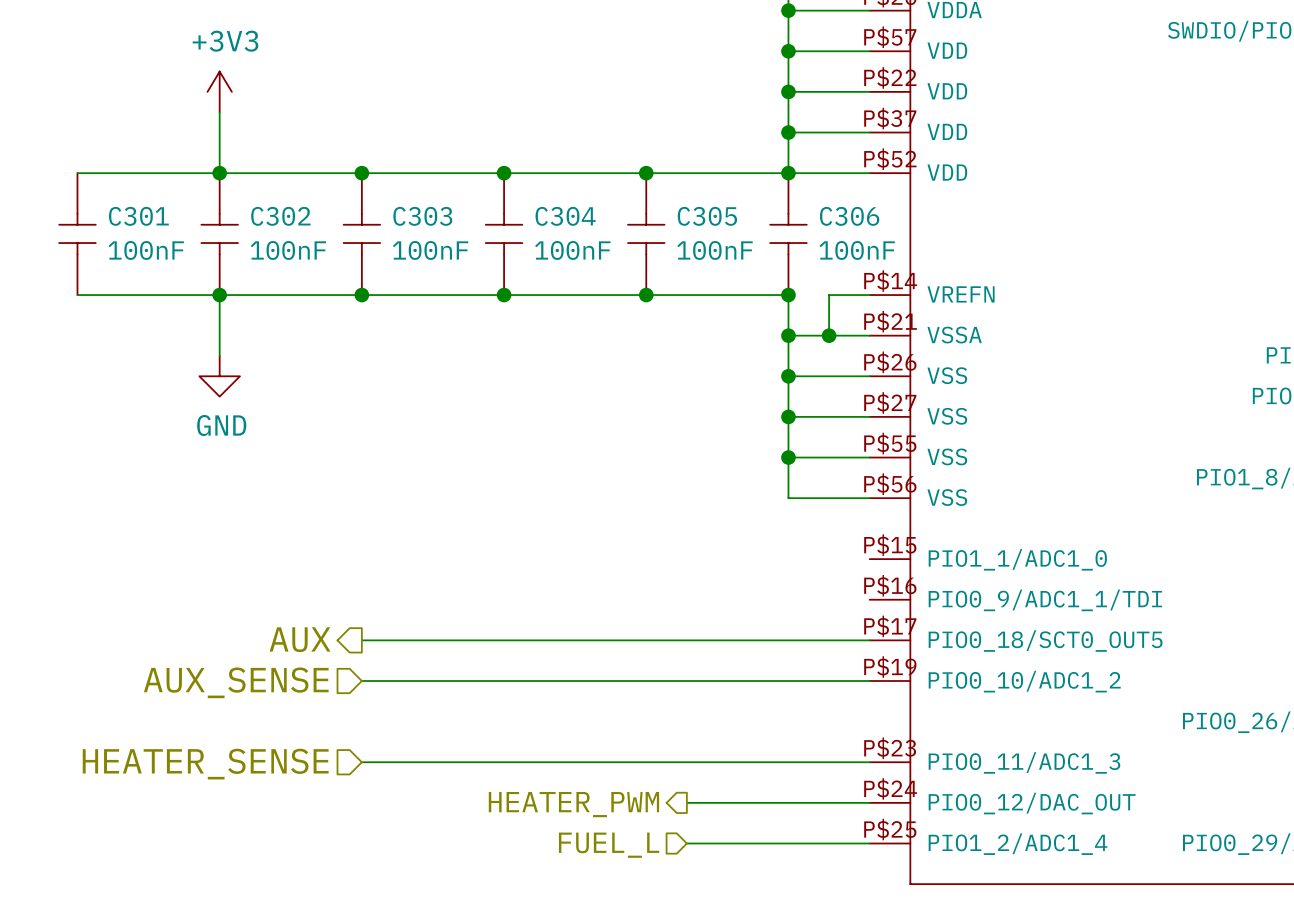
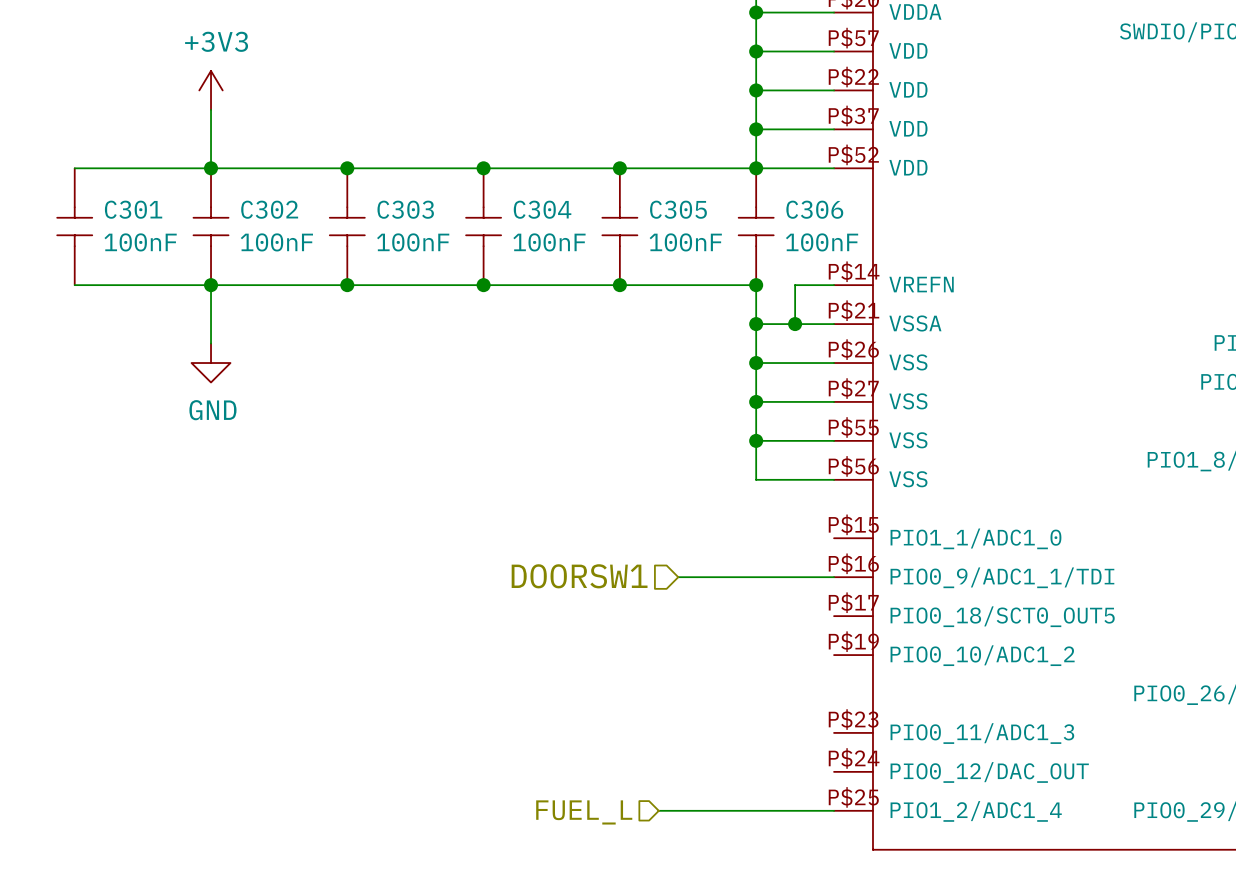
hierarchical label: none -> DOORSW1 (579, 576)
wire: none -> (678, 577) (834, 577)
hierarchical label: AUX (300, 639) -> none
wire: (361, 640) (869, 640) -> none
wire: (361, 680) (869, 680) -> none
hierarchical label: AUX_SENSE (236, 682) -> none
wire: (361, 762) (869, 762) -> none
hierarchical label: HEATER_SENSE (205, 764) -> none
wire: (686, 802) (869, 802) -> none
hierarchical label: HEATER_PWM (573, 804) -> none

